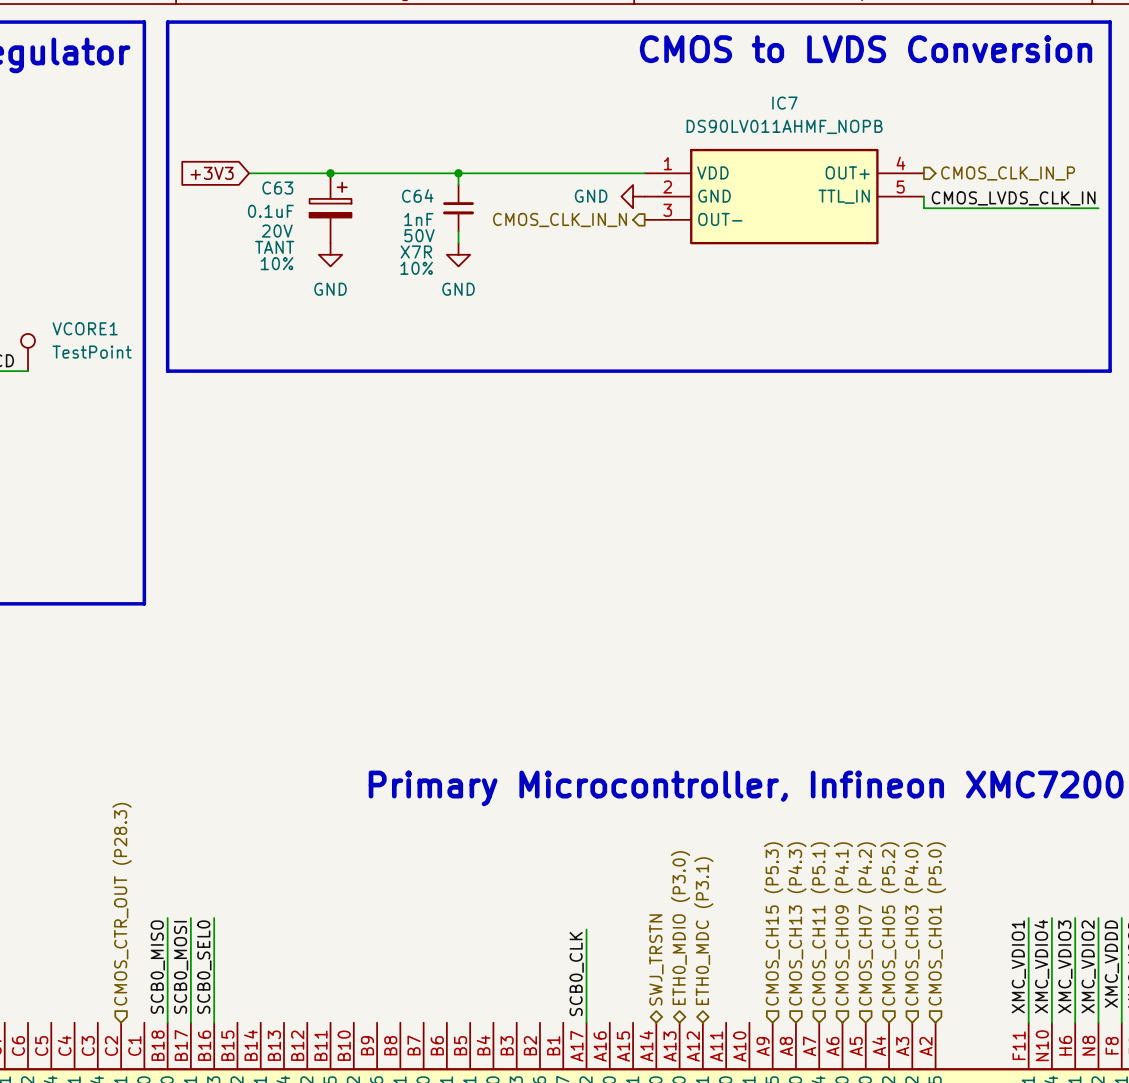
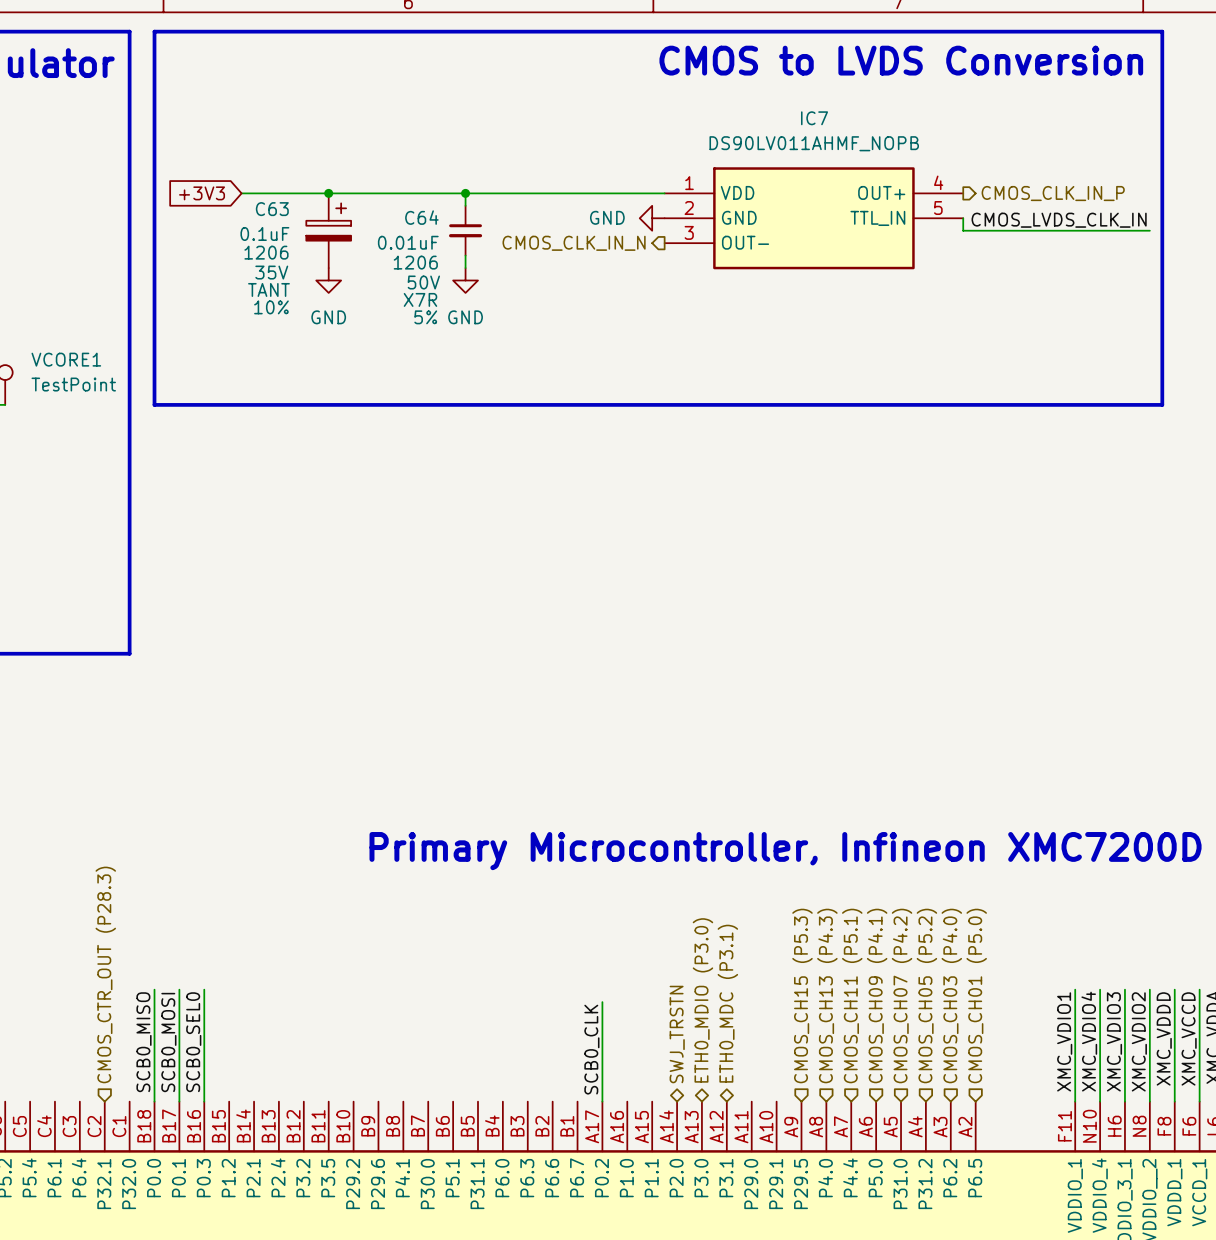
C64 value: 1nF (418, 219) -> 0.01uF (408, 242)
C63 text: none -> 1206 (266, 252)
C63 text: 20V (277, 231) -> 35V (271, 272)
C64 text position: 50V (419, 235) -> 50V (423, 282)
C64 text: none -> 1206 (415, 262)
C63 text position: TANT (274, 247) -> TANT (268, 289)
C64 text position: X7R (416, 252) -> X7R (420, 299)
C63 text position: 10% (277, 263) -> 10% (271, 307)
C64 text: 10% (416, 268) -> 5% (425, 317)

